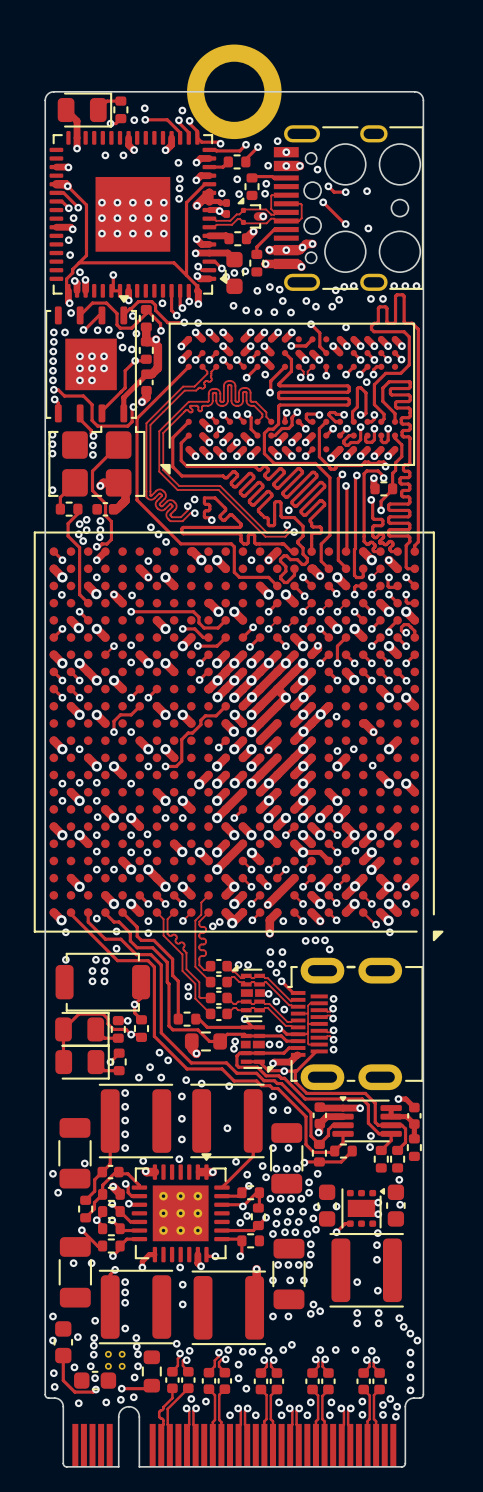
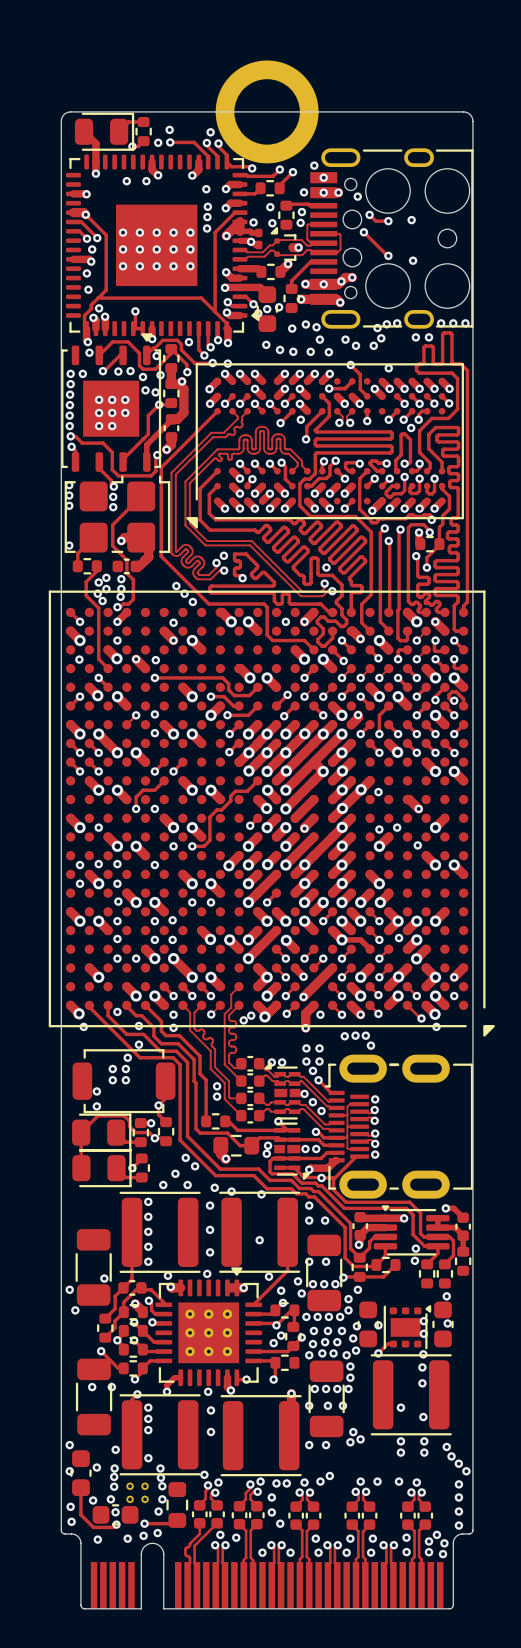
via: (65, 959) -> none
via: (95, 959) -> none
via: none -> (96, 1091)
via: none -> (96, 1106)

